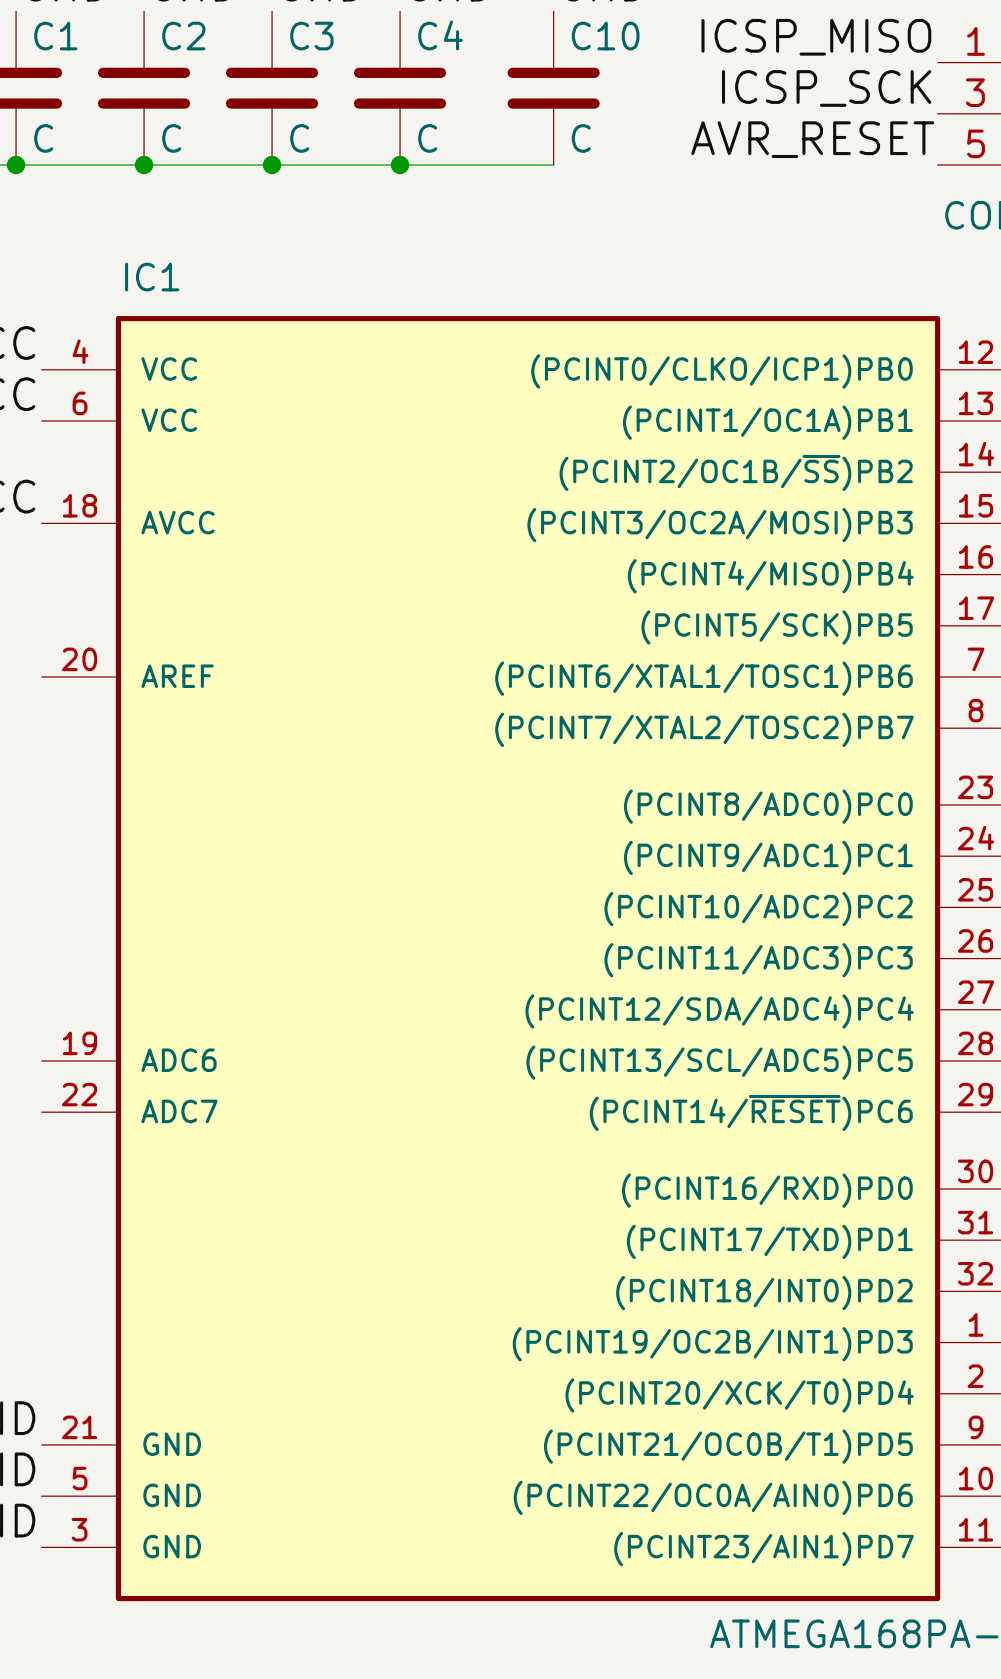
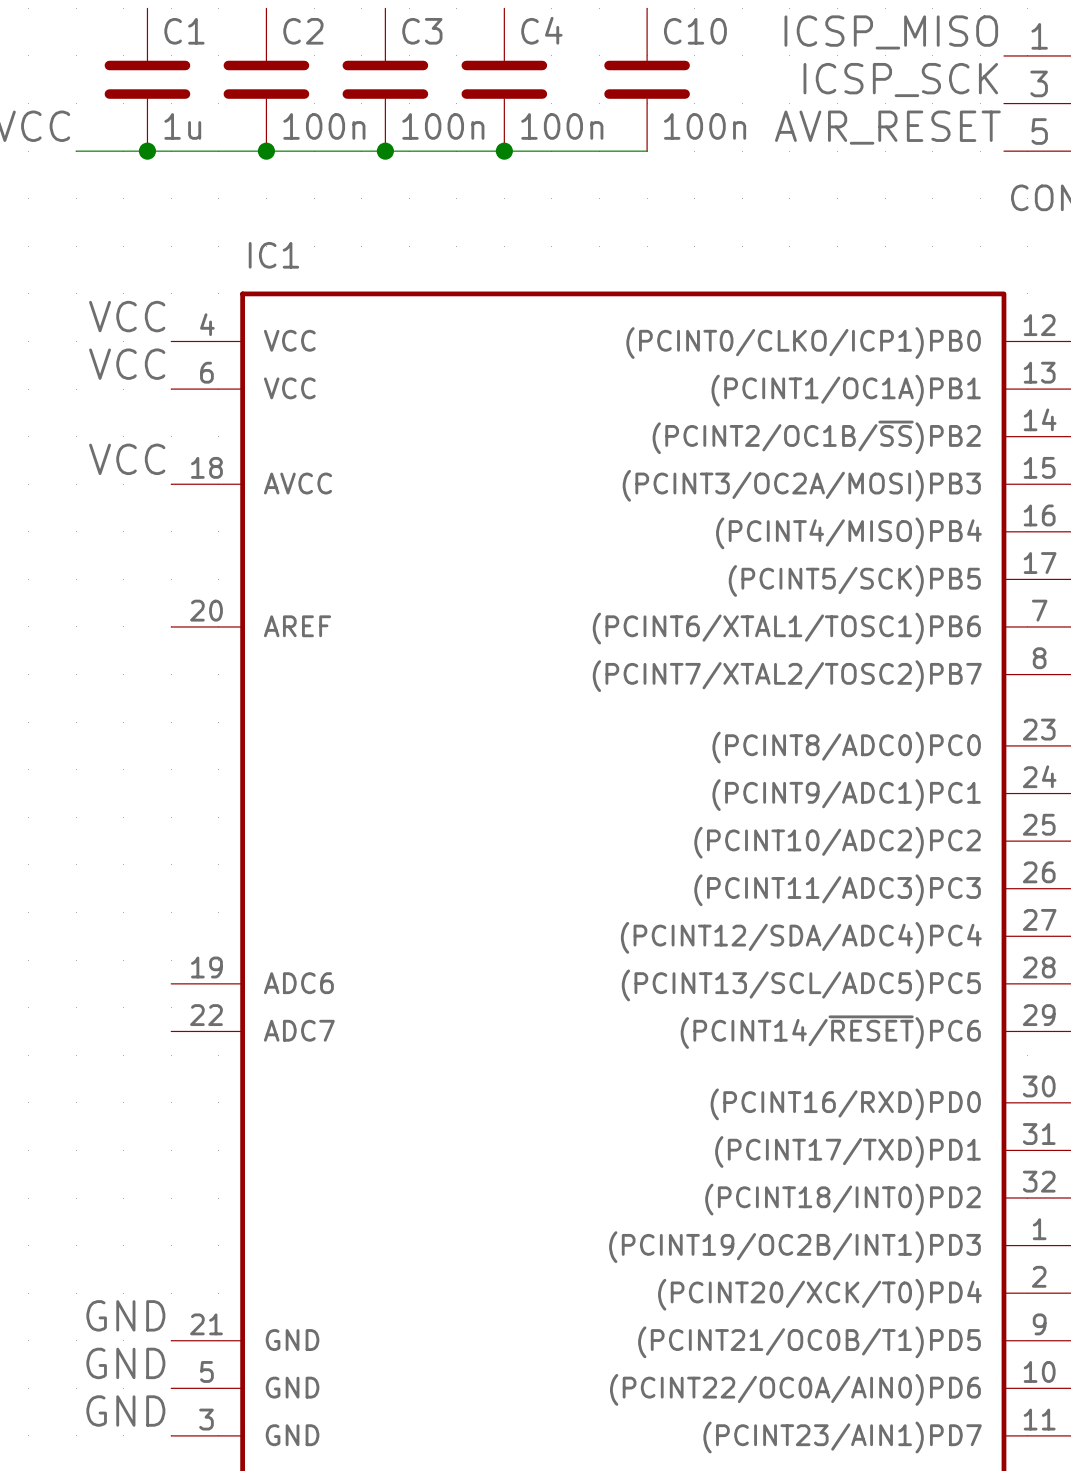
C1 value: C (43, 138) -> 1u (182, 126)
C2 value: C (171, 138) -> 100n (324, 126)
C3 value: C (299, 138) -> 100n (443, 126)
C4 value: C (427, 138) -> 100n (562, 126)
C10 value: C (581, 138) -> 100n (705, 126)

